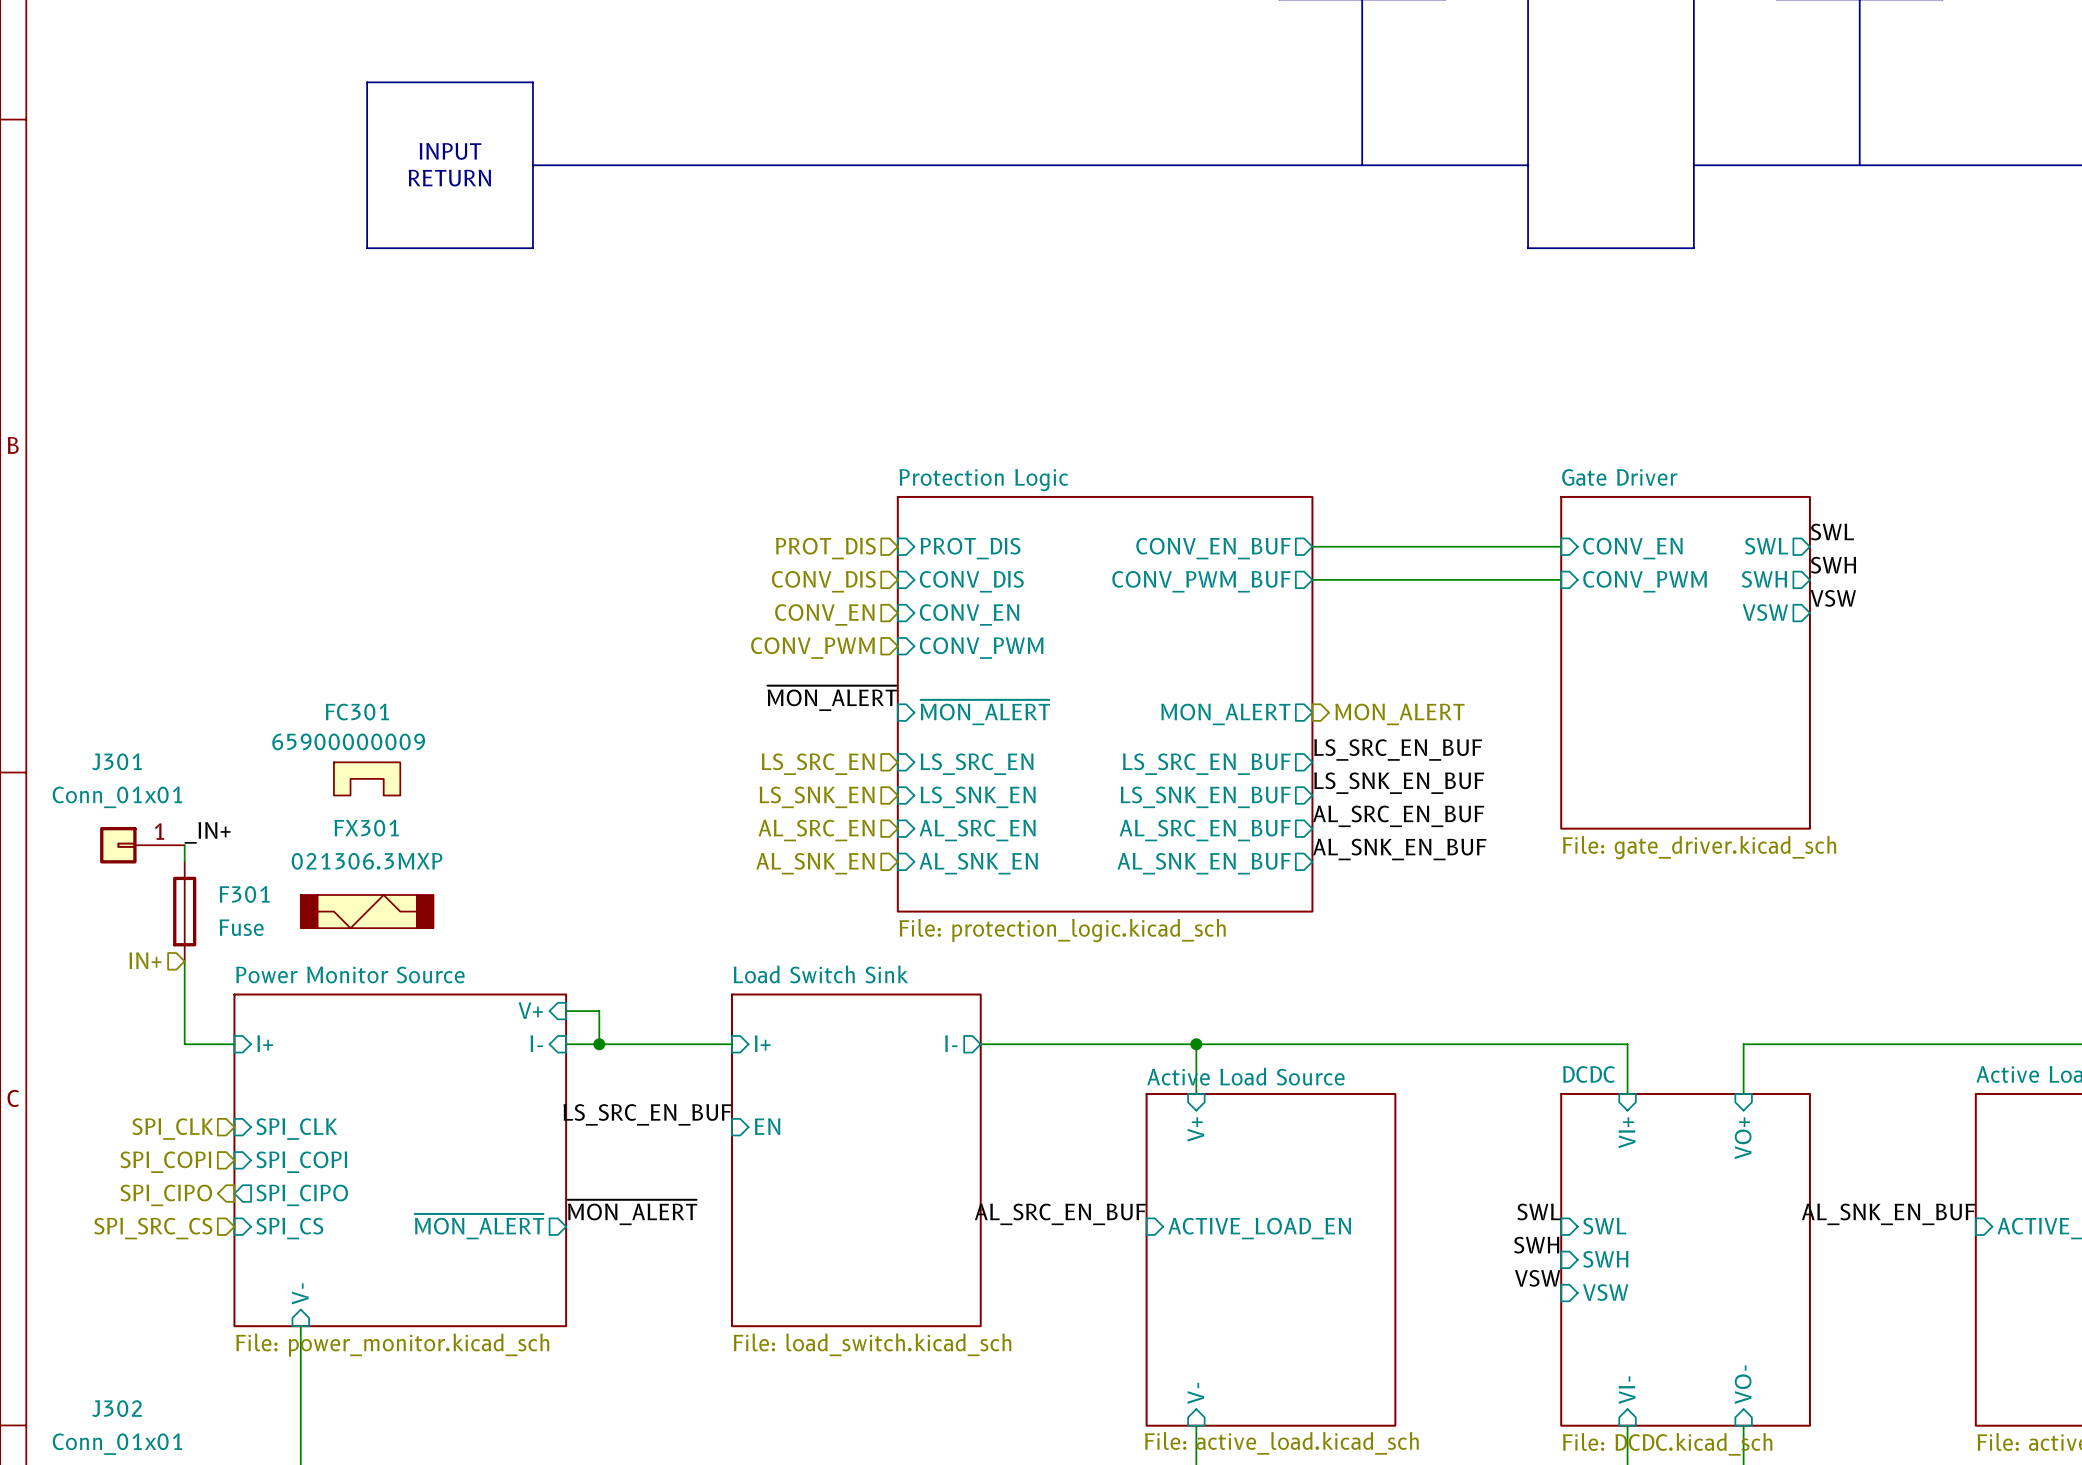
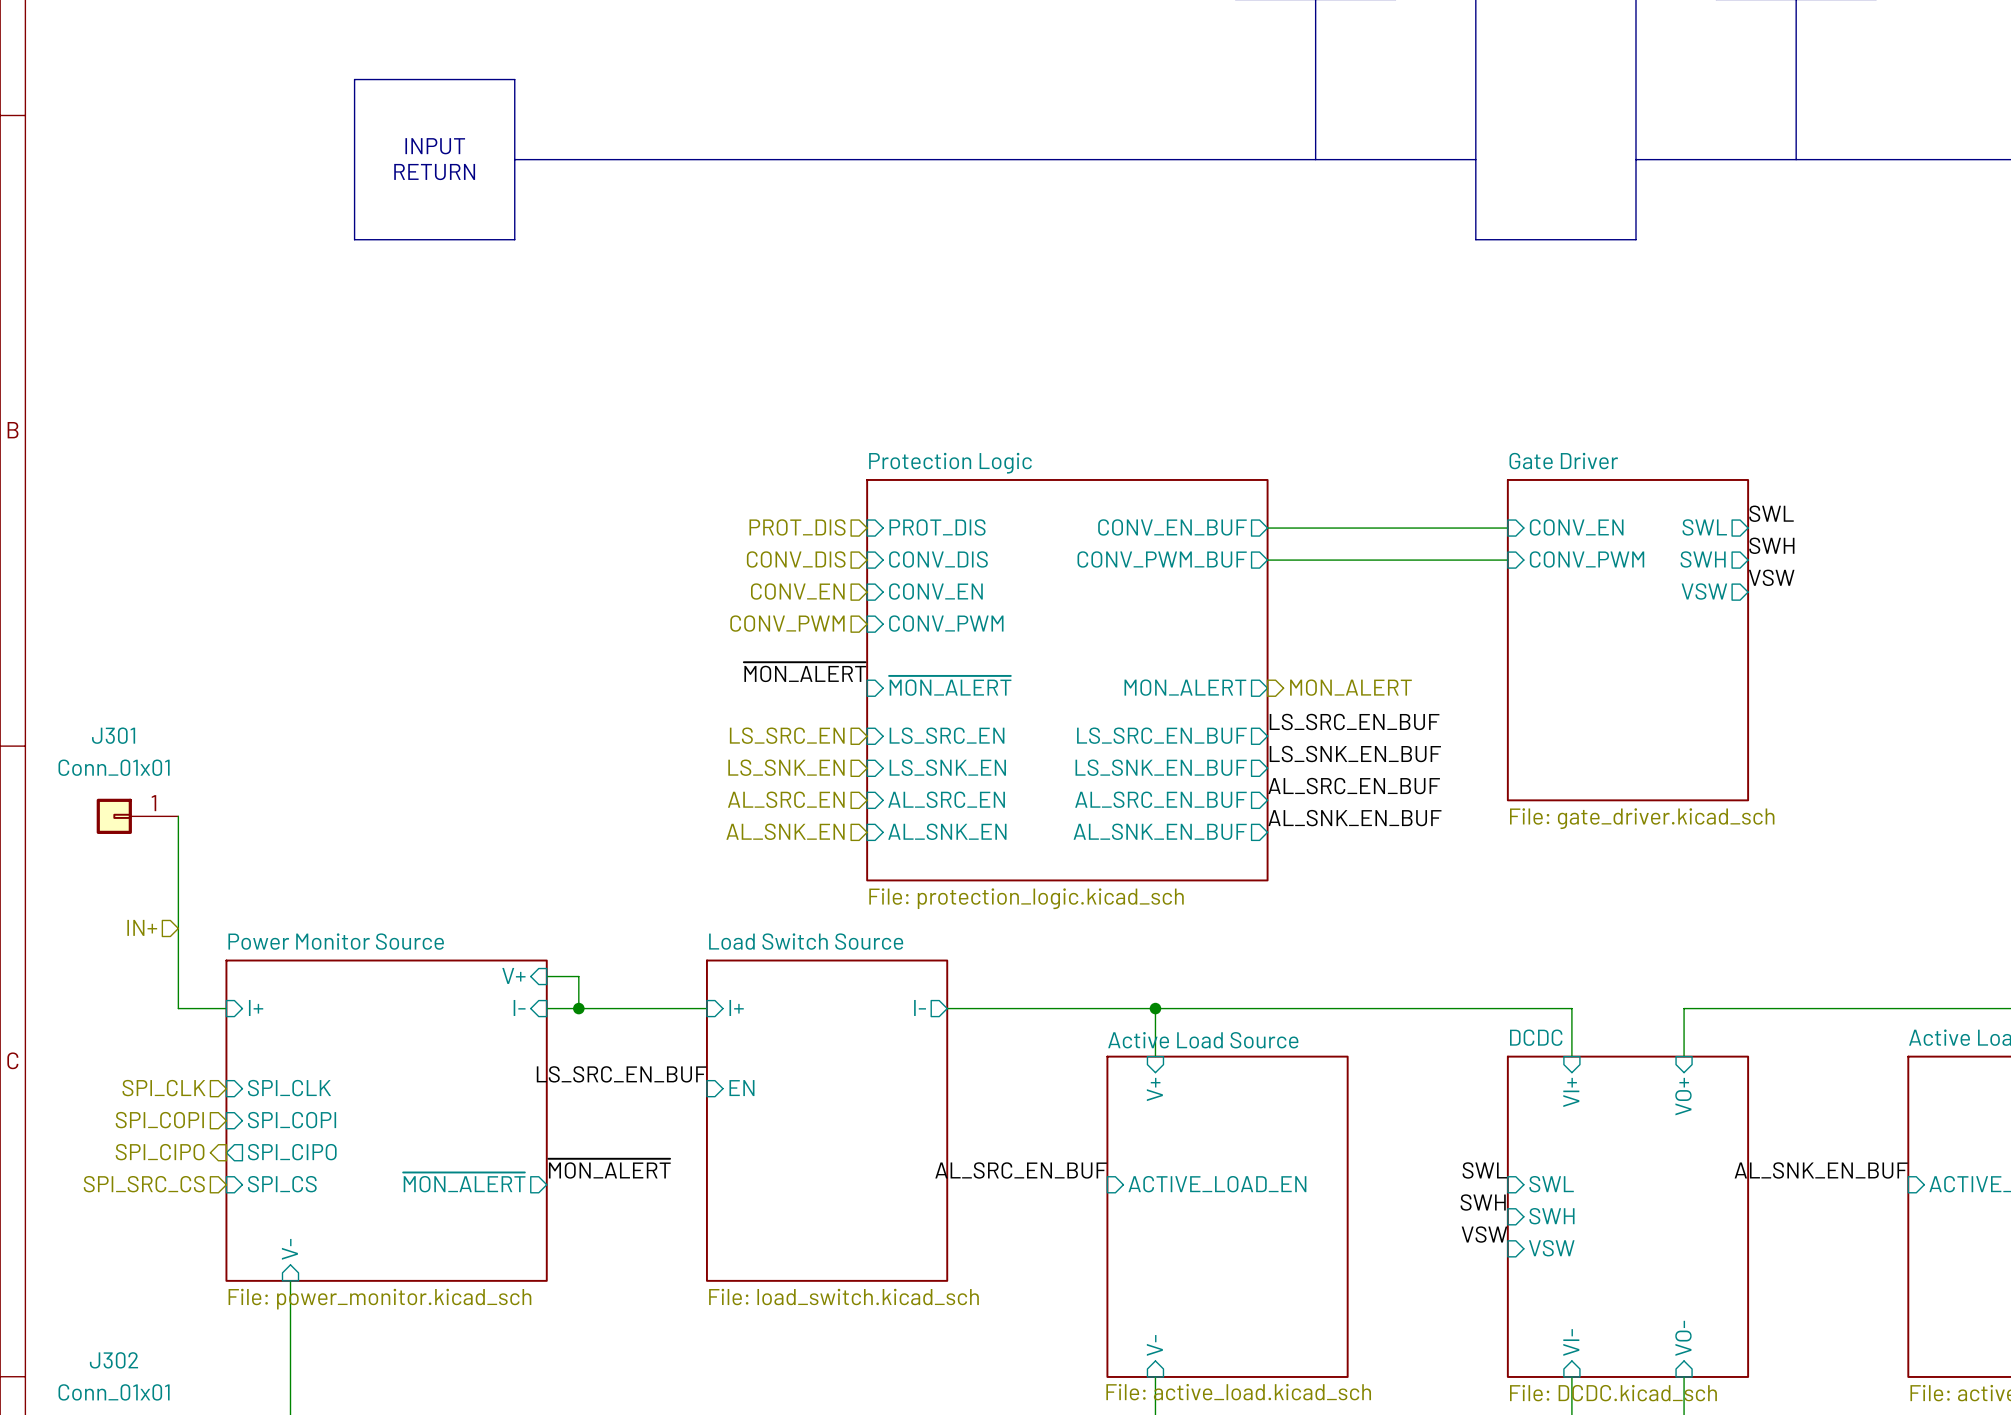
FC301: 65900000009 (367, 778) -> none
label: _IN+ (207, 832) -> none
F301: Fuse (184, 911) -> none
FX301: 021306.3MXP (367, 911) -> none
sheet Load Switch Sink name: Load Switch Sink (820, 974) -> Load Switch Source (806, 941)

